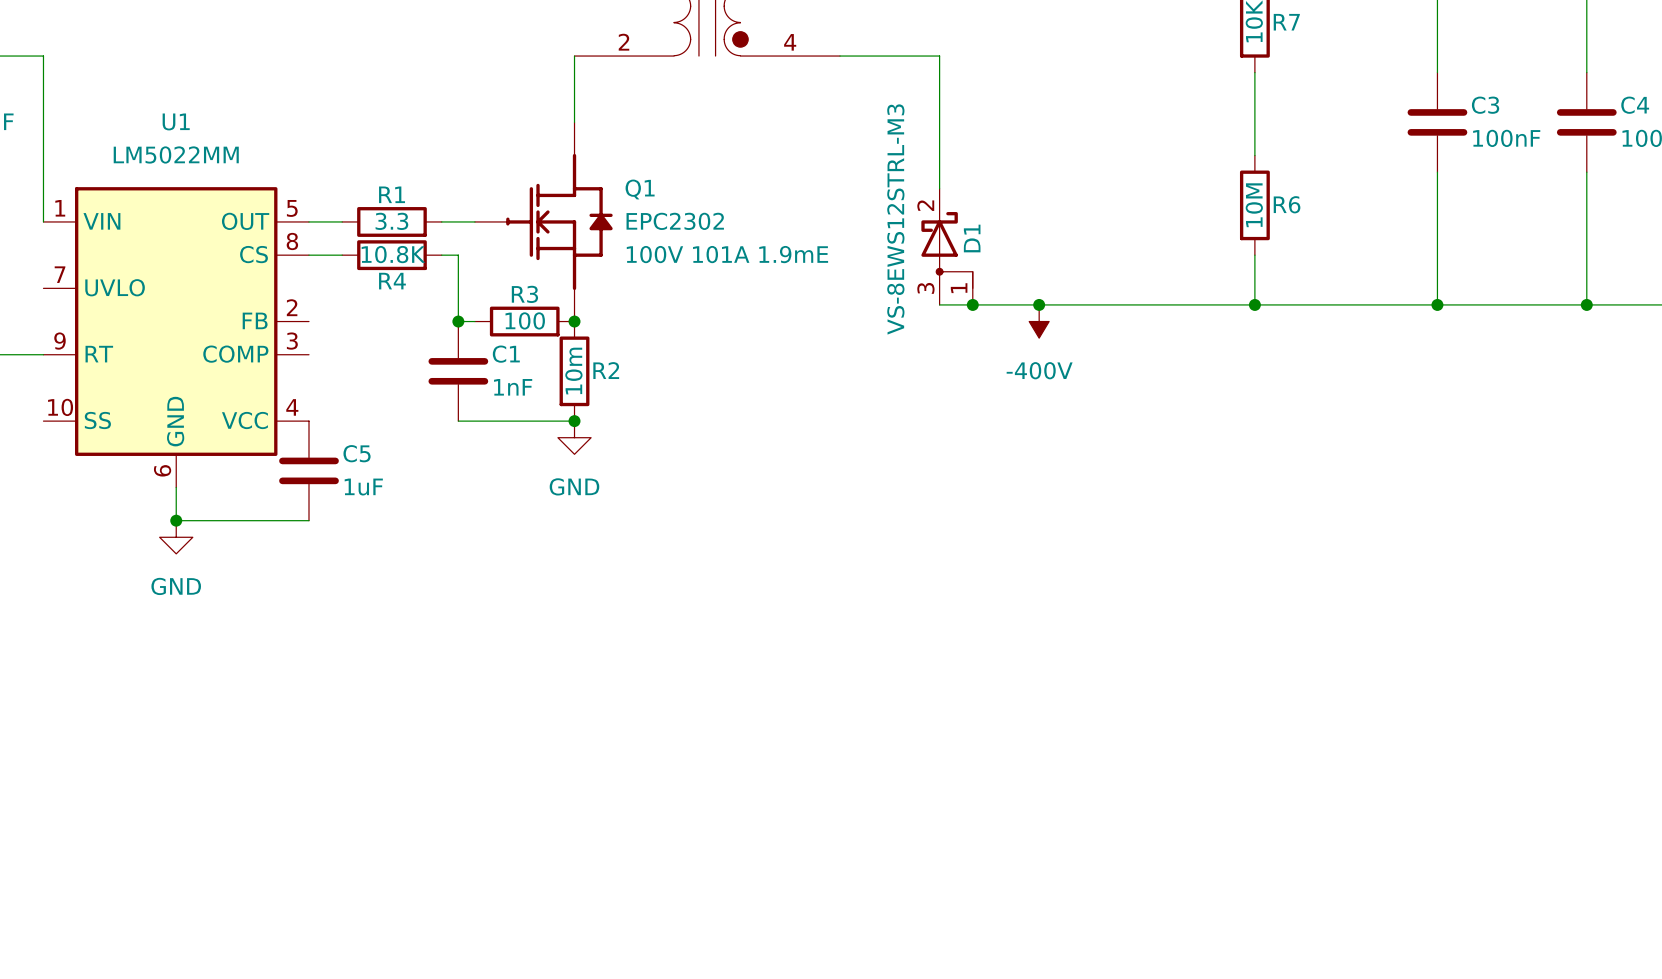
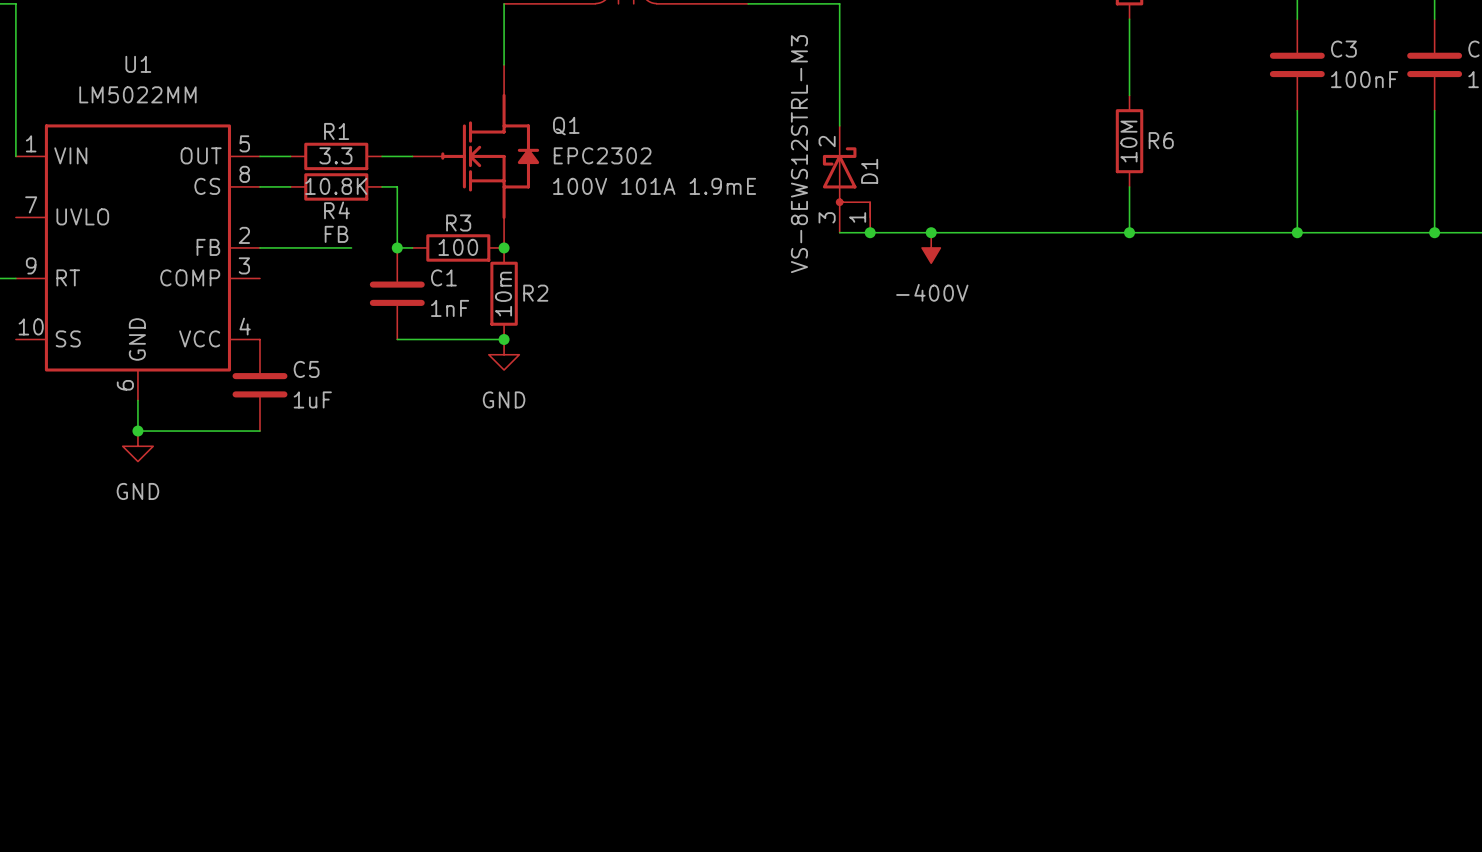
label: none -> FB (336, 234)
wire: none -> (259, 247) (351, 247)

